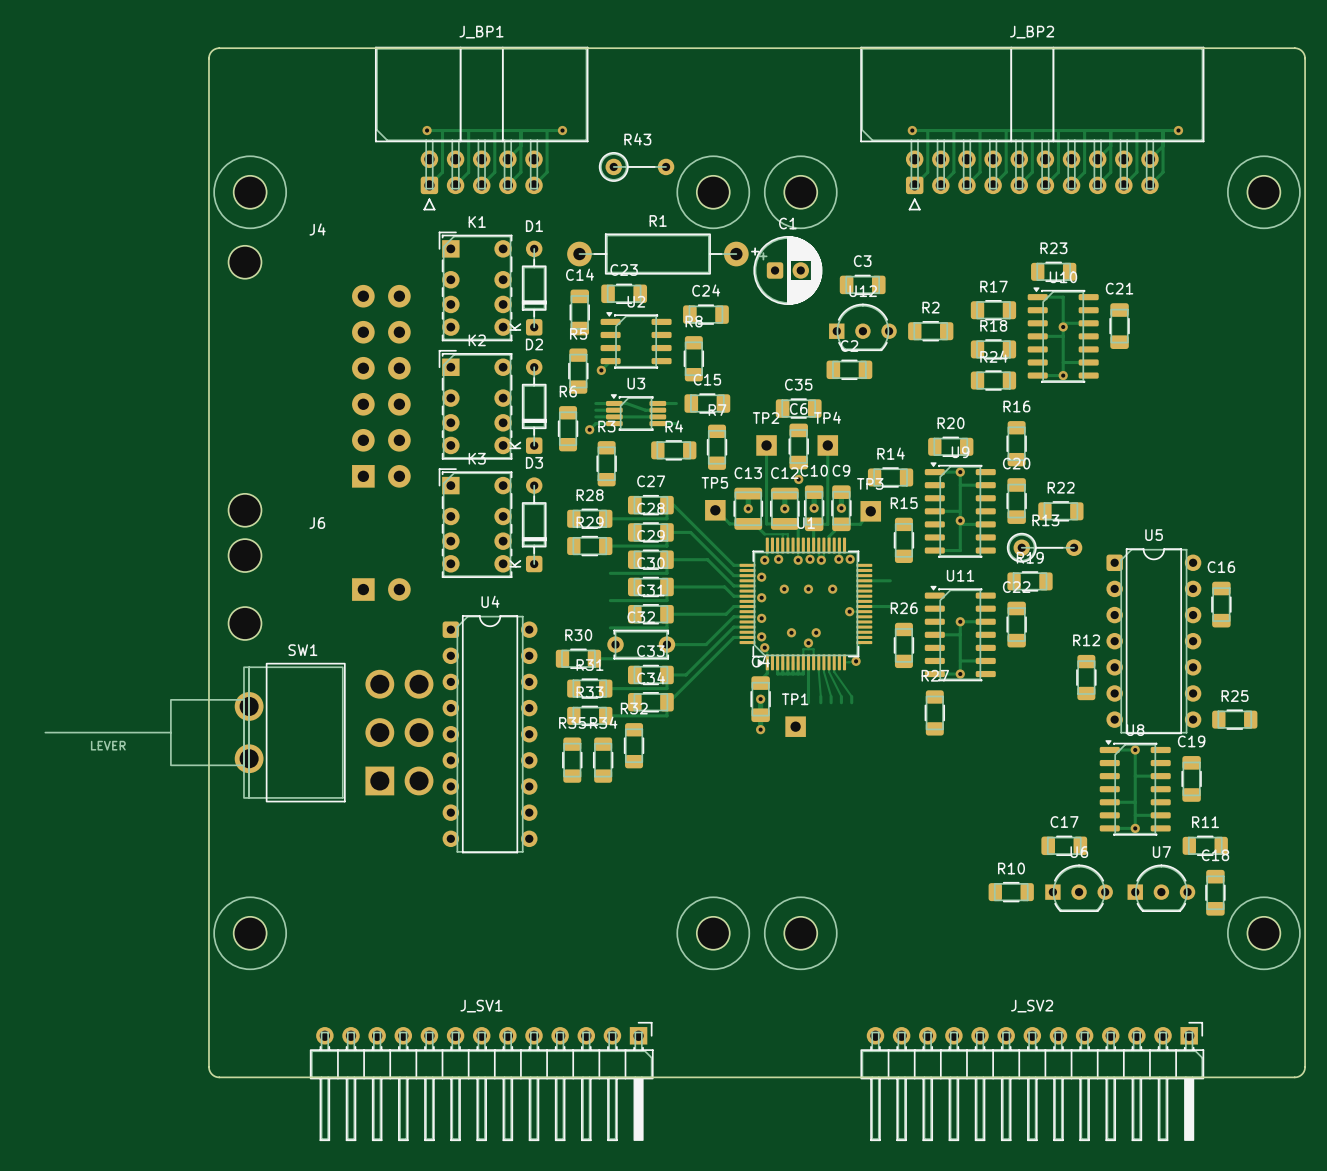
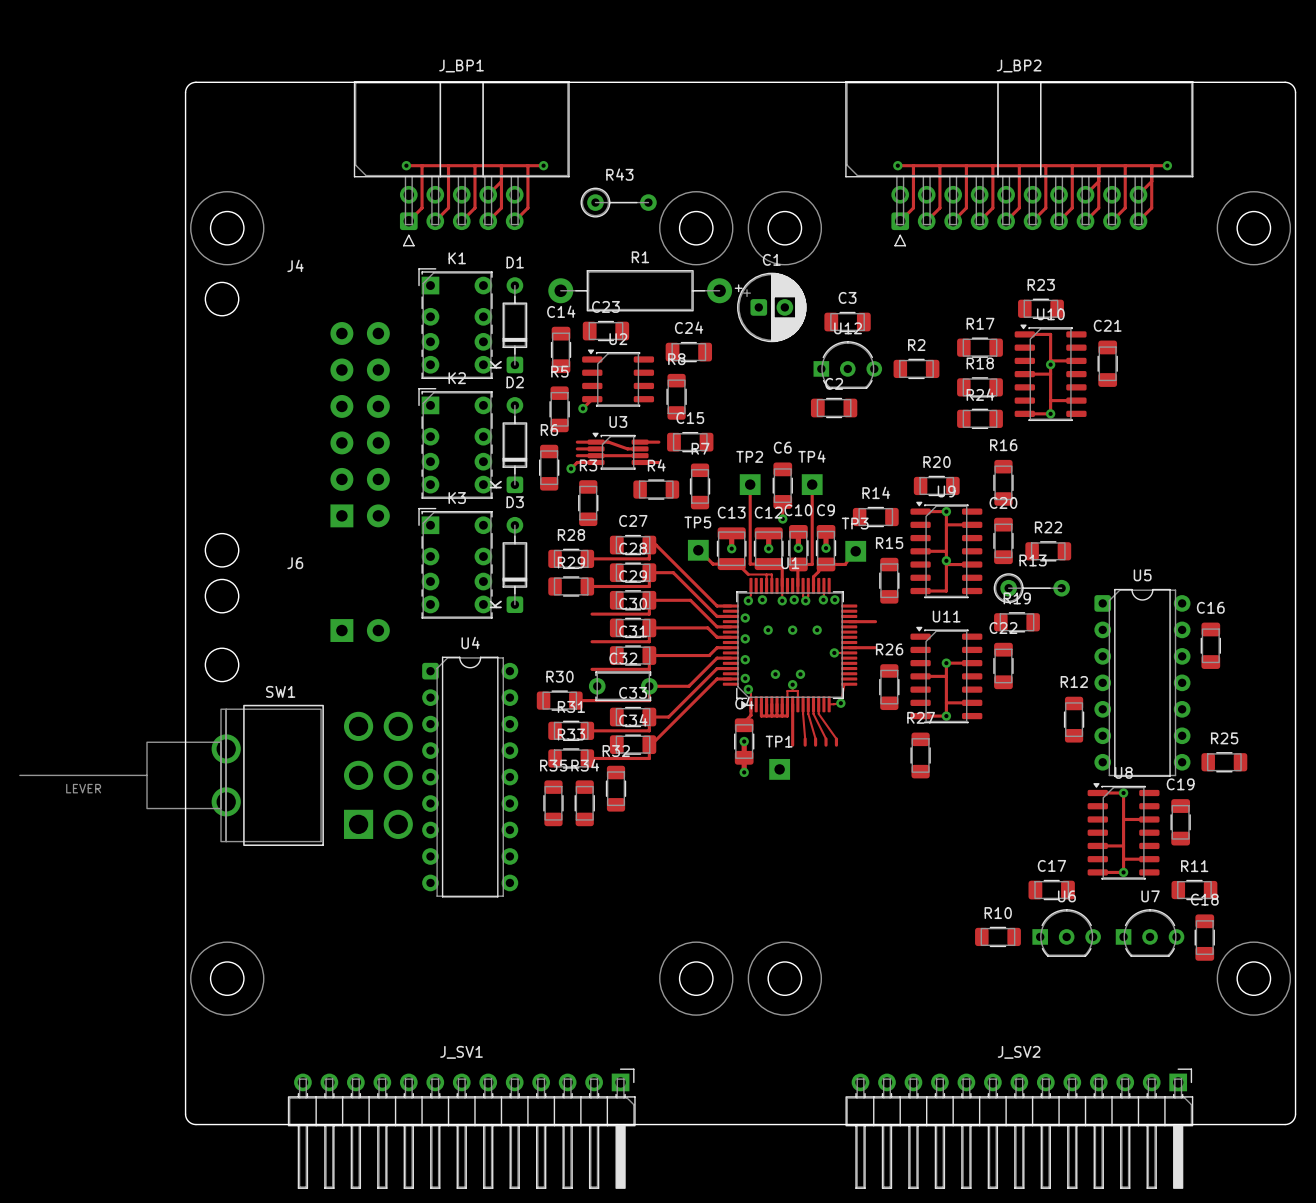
C35: (798, 408) -> none

